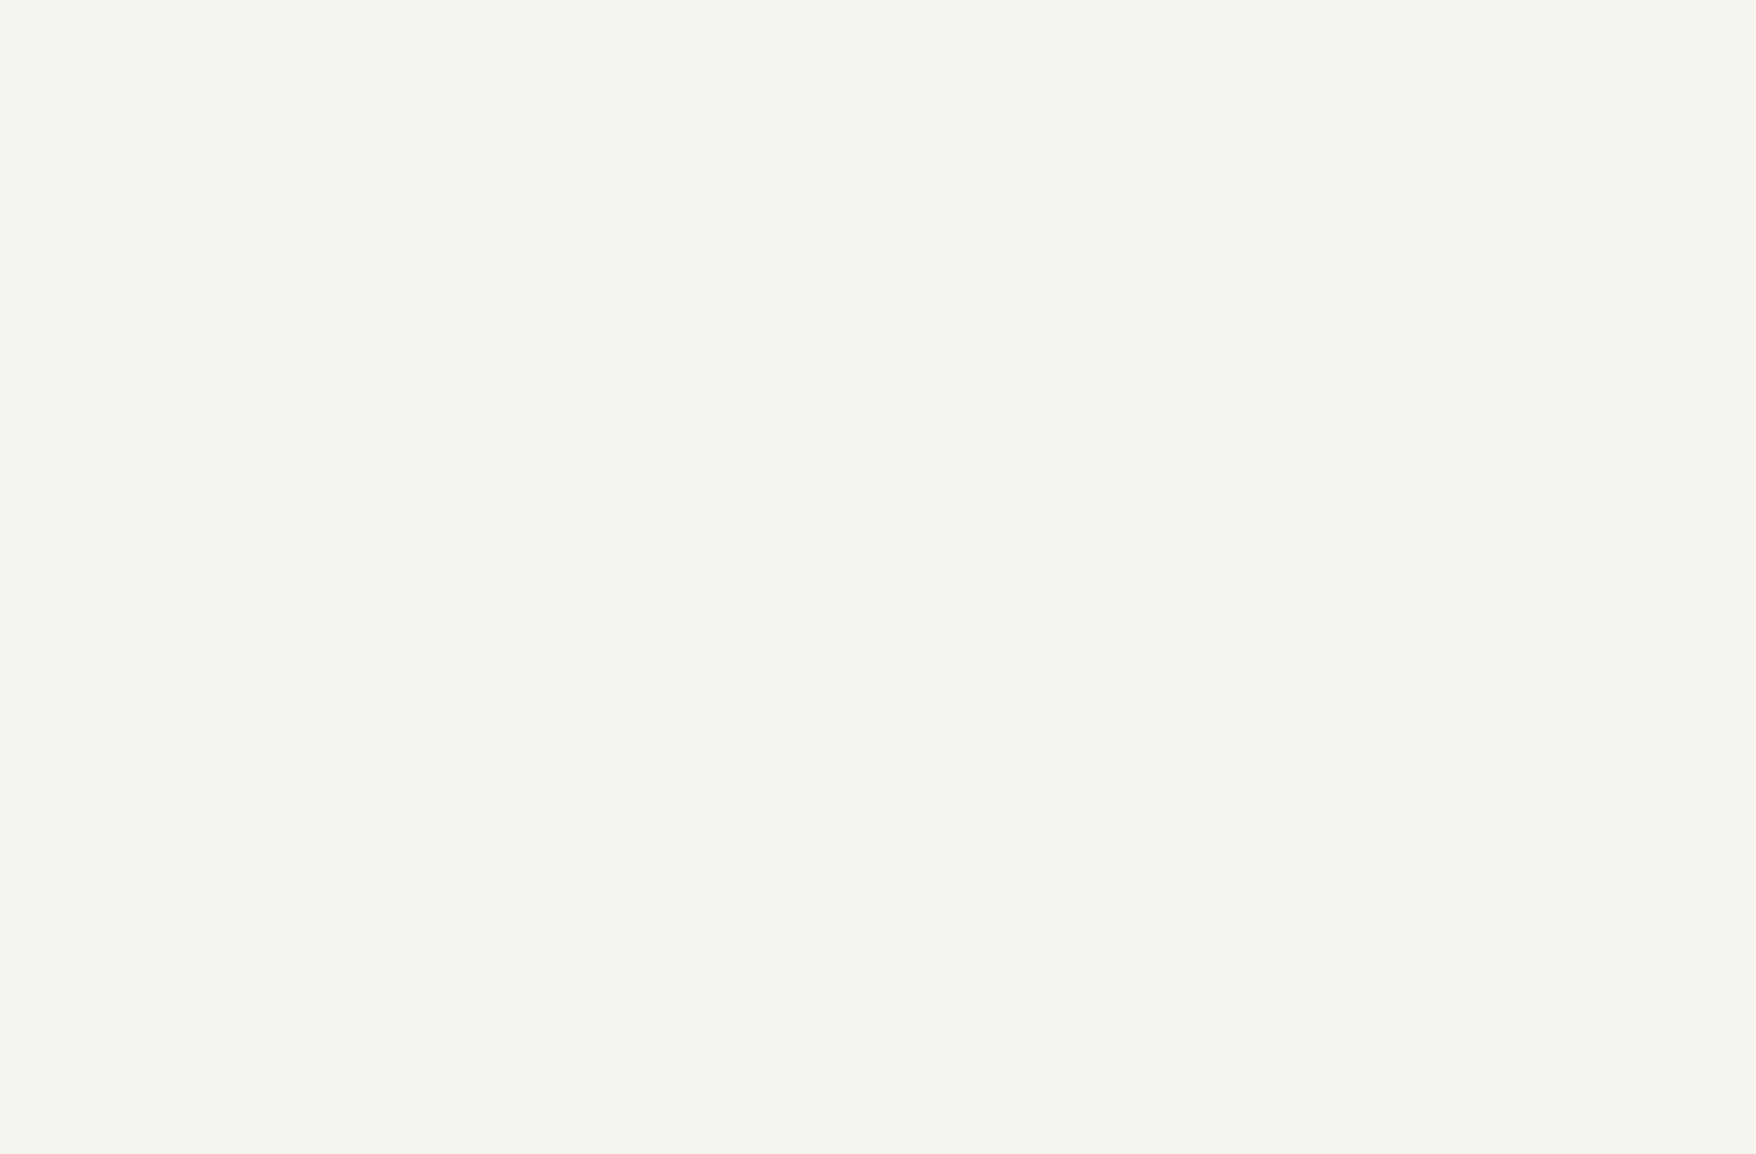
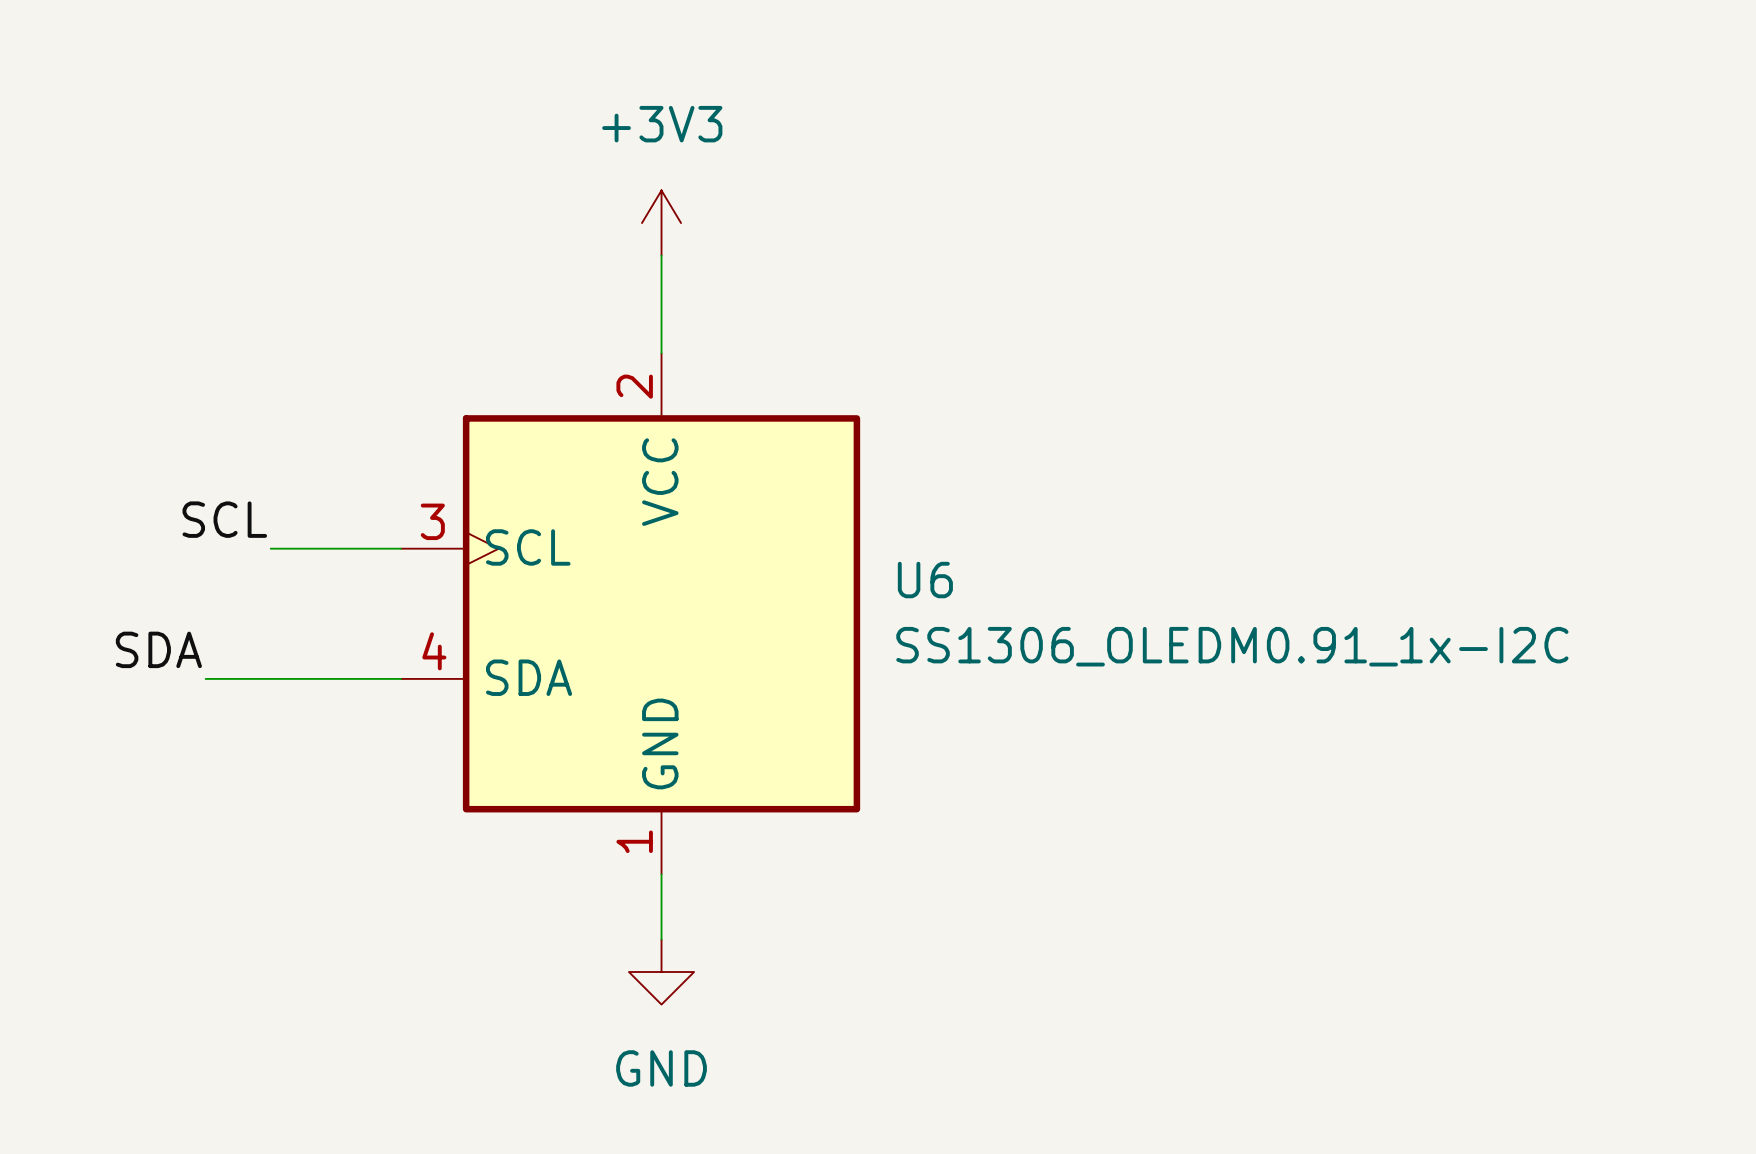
power symbol: none -> +3V3 (661, 223)
wire: none -> (661, 255) (661, 353)
label: none -> SCL (224, 519)
wire: none -> (270, 548) (401, 548)
U6: none -> SS1306_OLEDM0.91_1x-I2C (630, 613)
label: none -> SDA (158, 649)
wire: none -> (205, 678) (401, 678)
wire: none -> (661, 874) (661, 939)
power symbol: none -> GND (661, 972)

